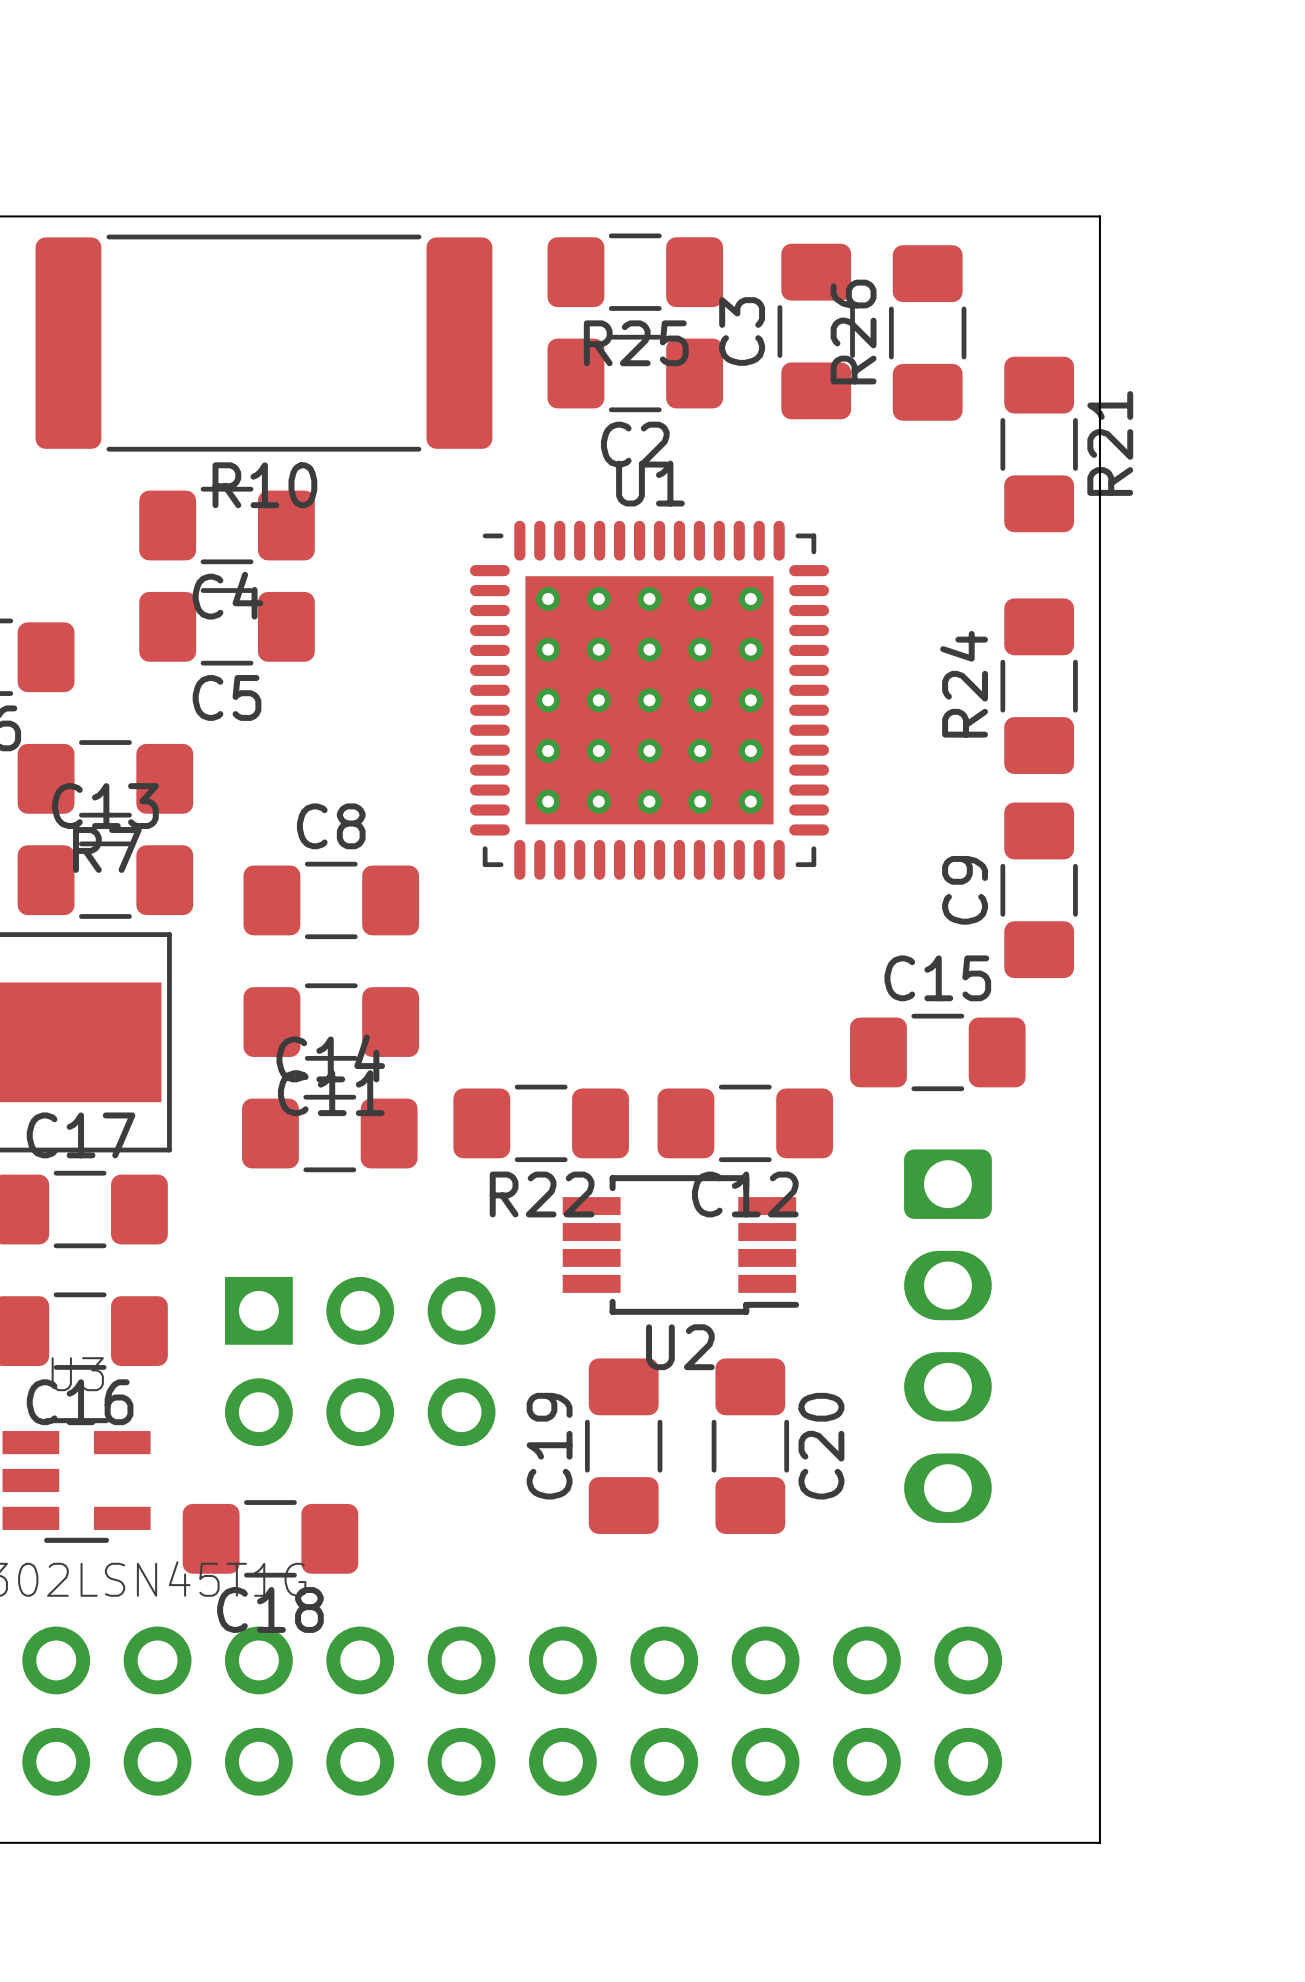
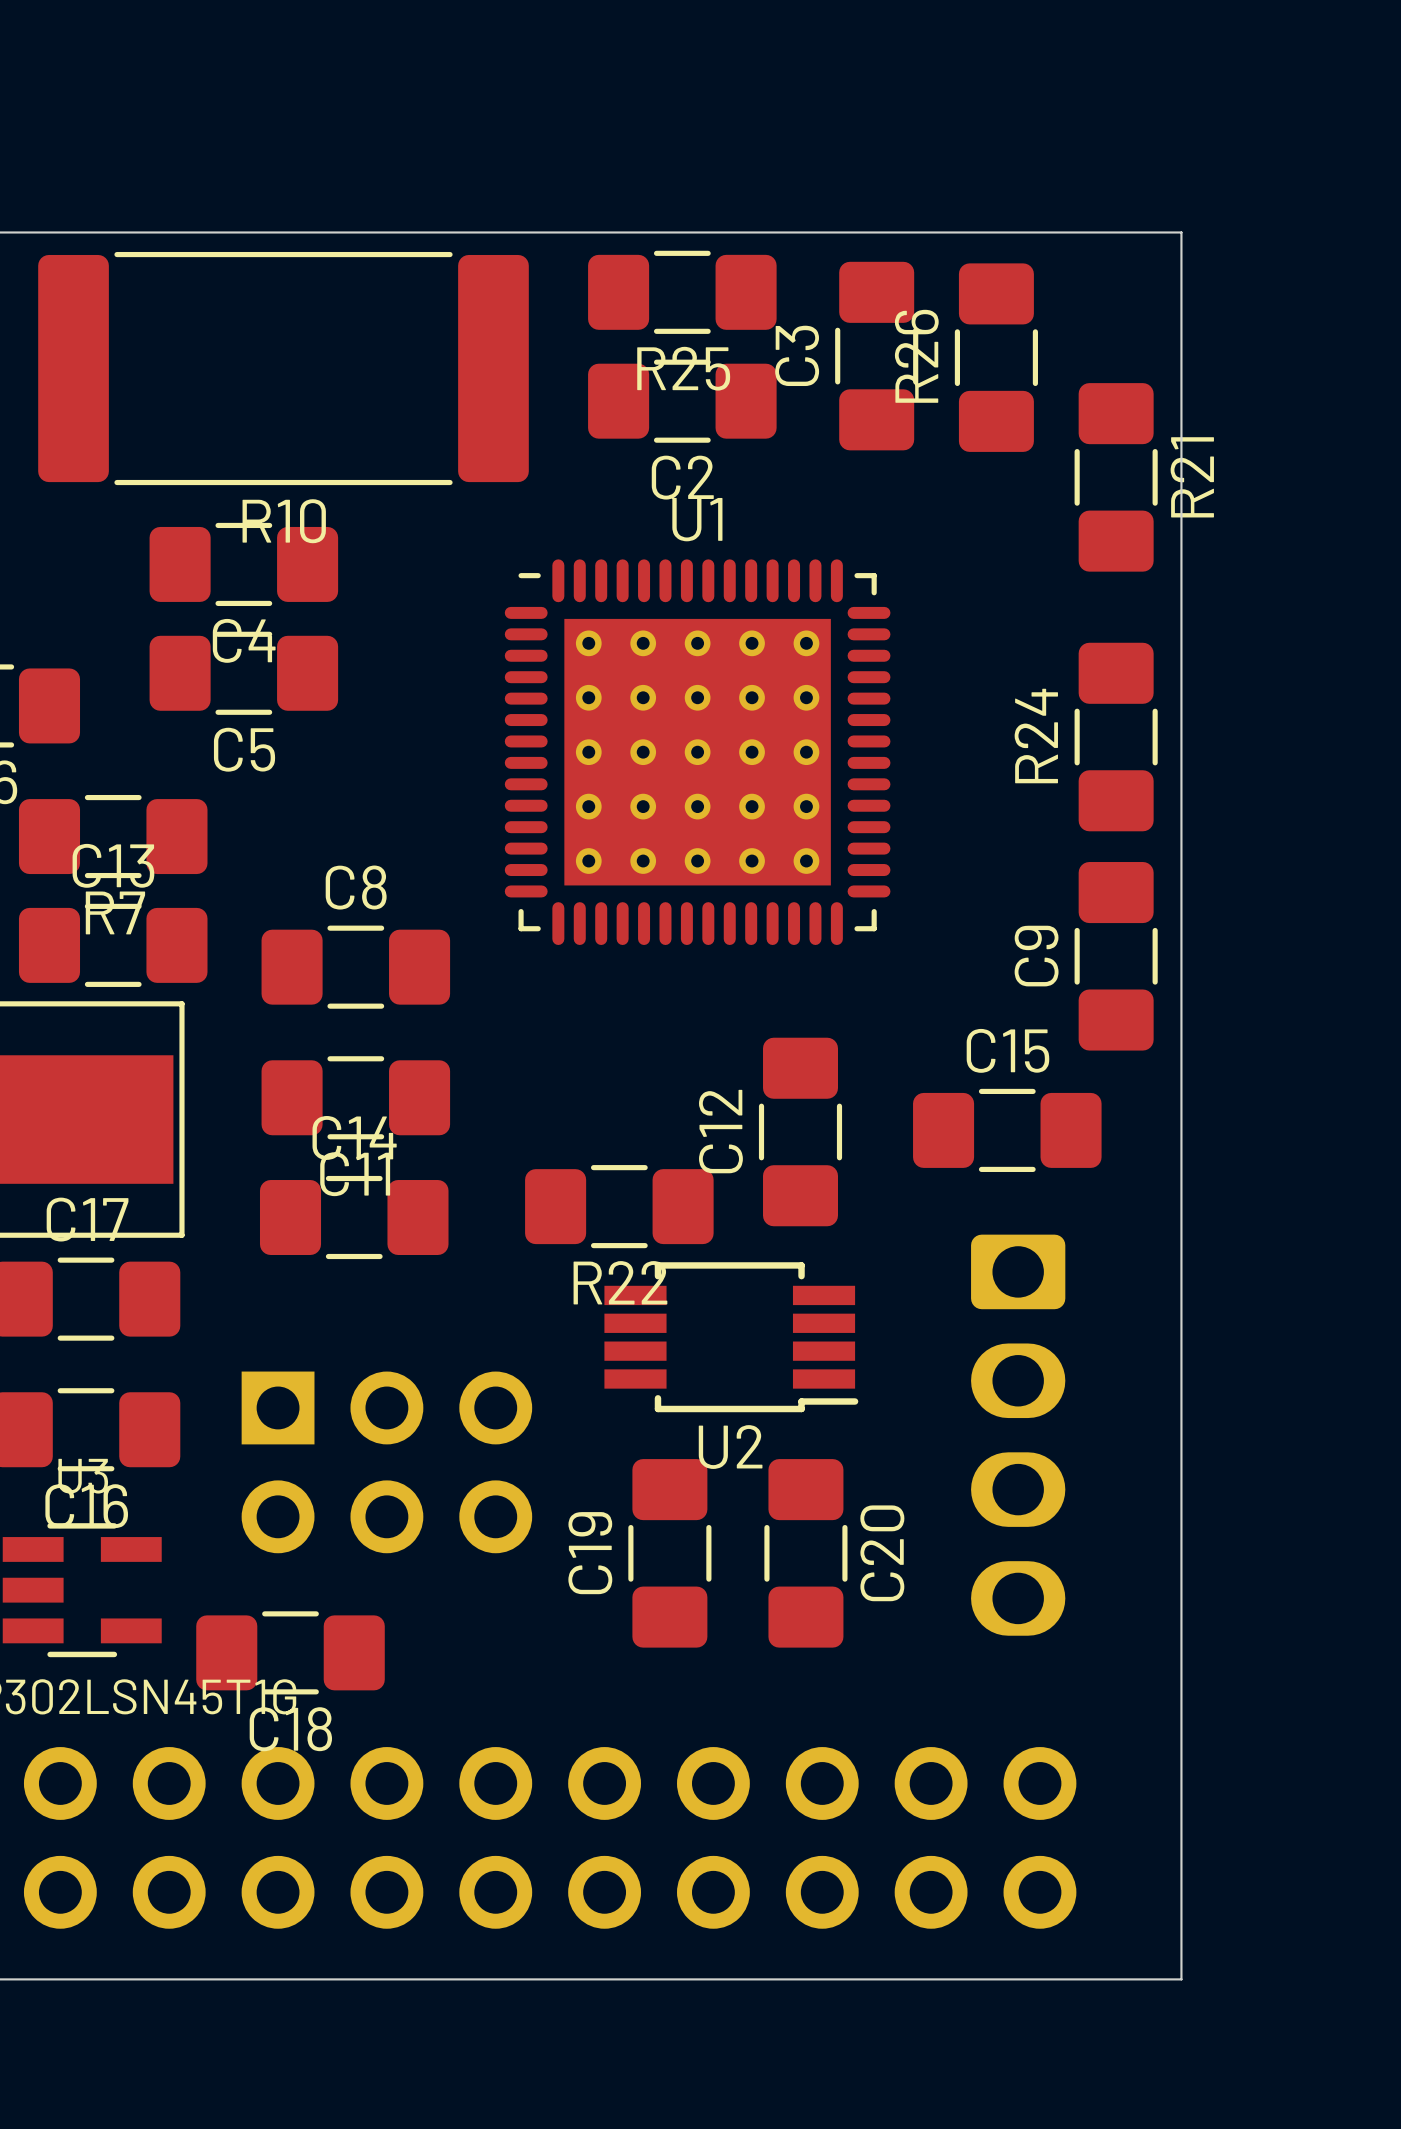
R22 position: (541, 1123) -> (619, 1206)
C12 rotation: 0° (745, 1123) -> 90° clockwise (800, 1131)

